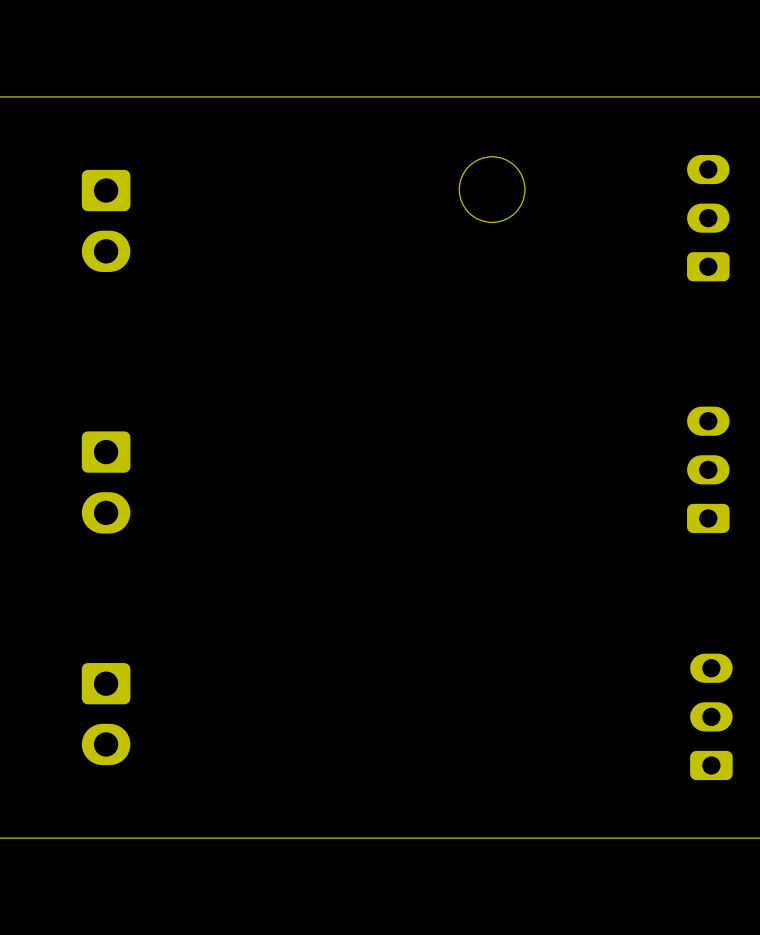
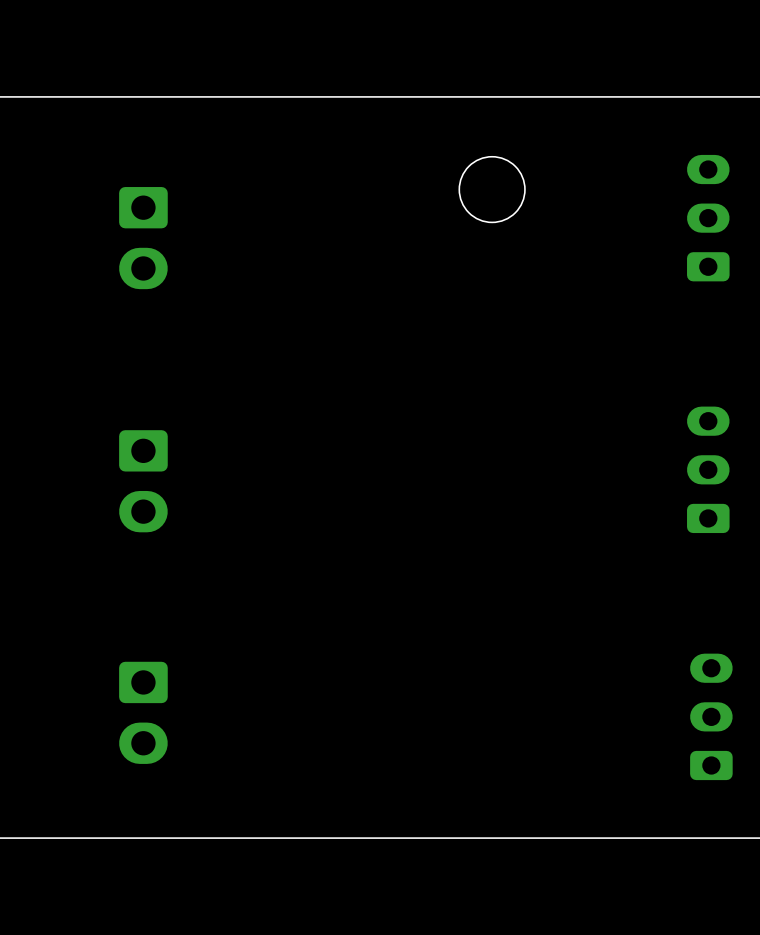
part position: (106, 220) -> (143, 238)
part position: (106, 482) -> (143, 481)
part position: (106, 714) -> (143, 712)

